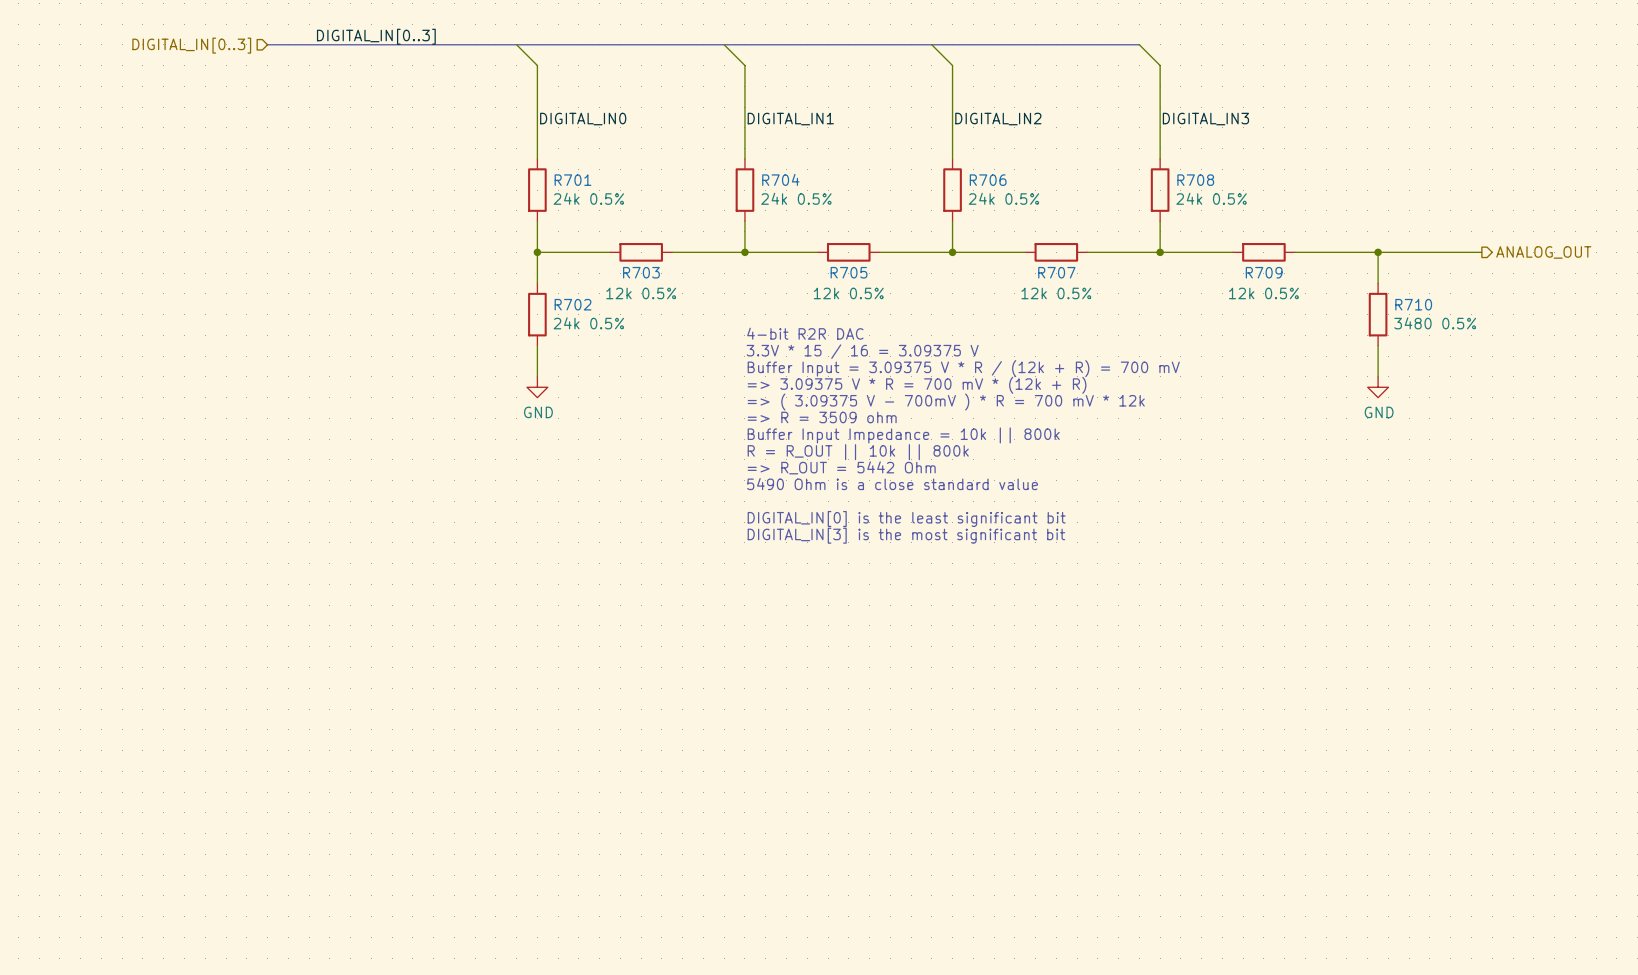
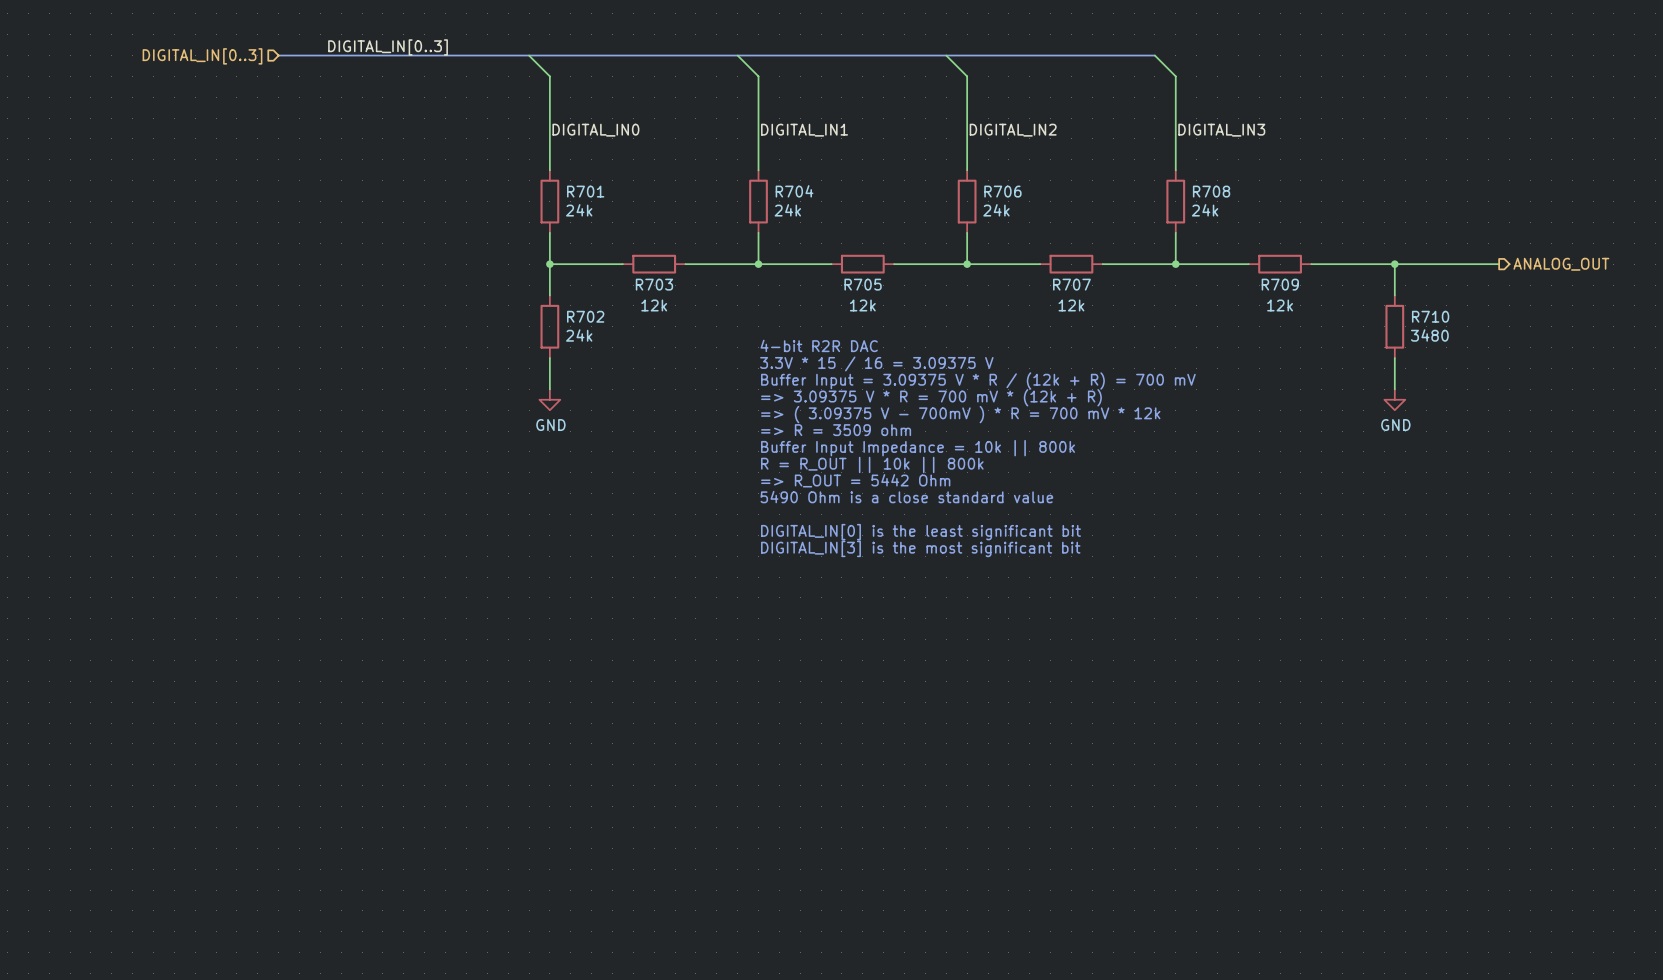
R701 value: 24k 0.5% (588, 198) -> 24k (579, 210)
R704 value: 24k 0.5% (796, 198) -> 24k (787, 210)
R706 value: 24k 0.5% (1003, 198) -> 24k (996, 210)
R708 value: 24k 0.5% (1211, 198) -> 24k (1205, 210)
R703 value: 12k 0.5% (641, 293) -> 12k (654, 305)
R705 value: 12k 0.5% (848, 293) -> 12k (862, 305)
R707 value: 12k 0.5% (1056, 293) -> 12k (1071, 305)
R709 value: 12k 0.5% (1263, 293) -> 12k (1280, 305)
R702 value: 24k 0.5% (588, 323) -> 24k (579, 335)
R710 value: 3480 0.5% (1435, 323) -> 3480 (1429, 335)

